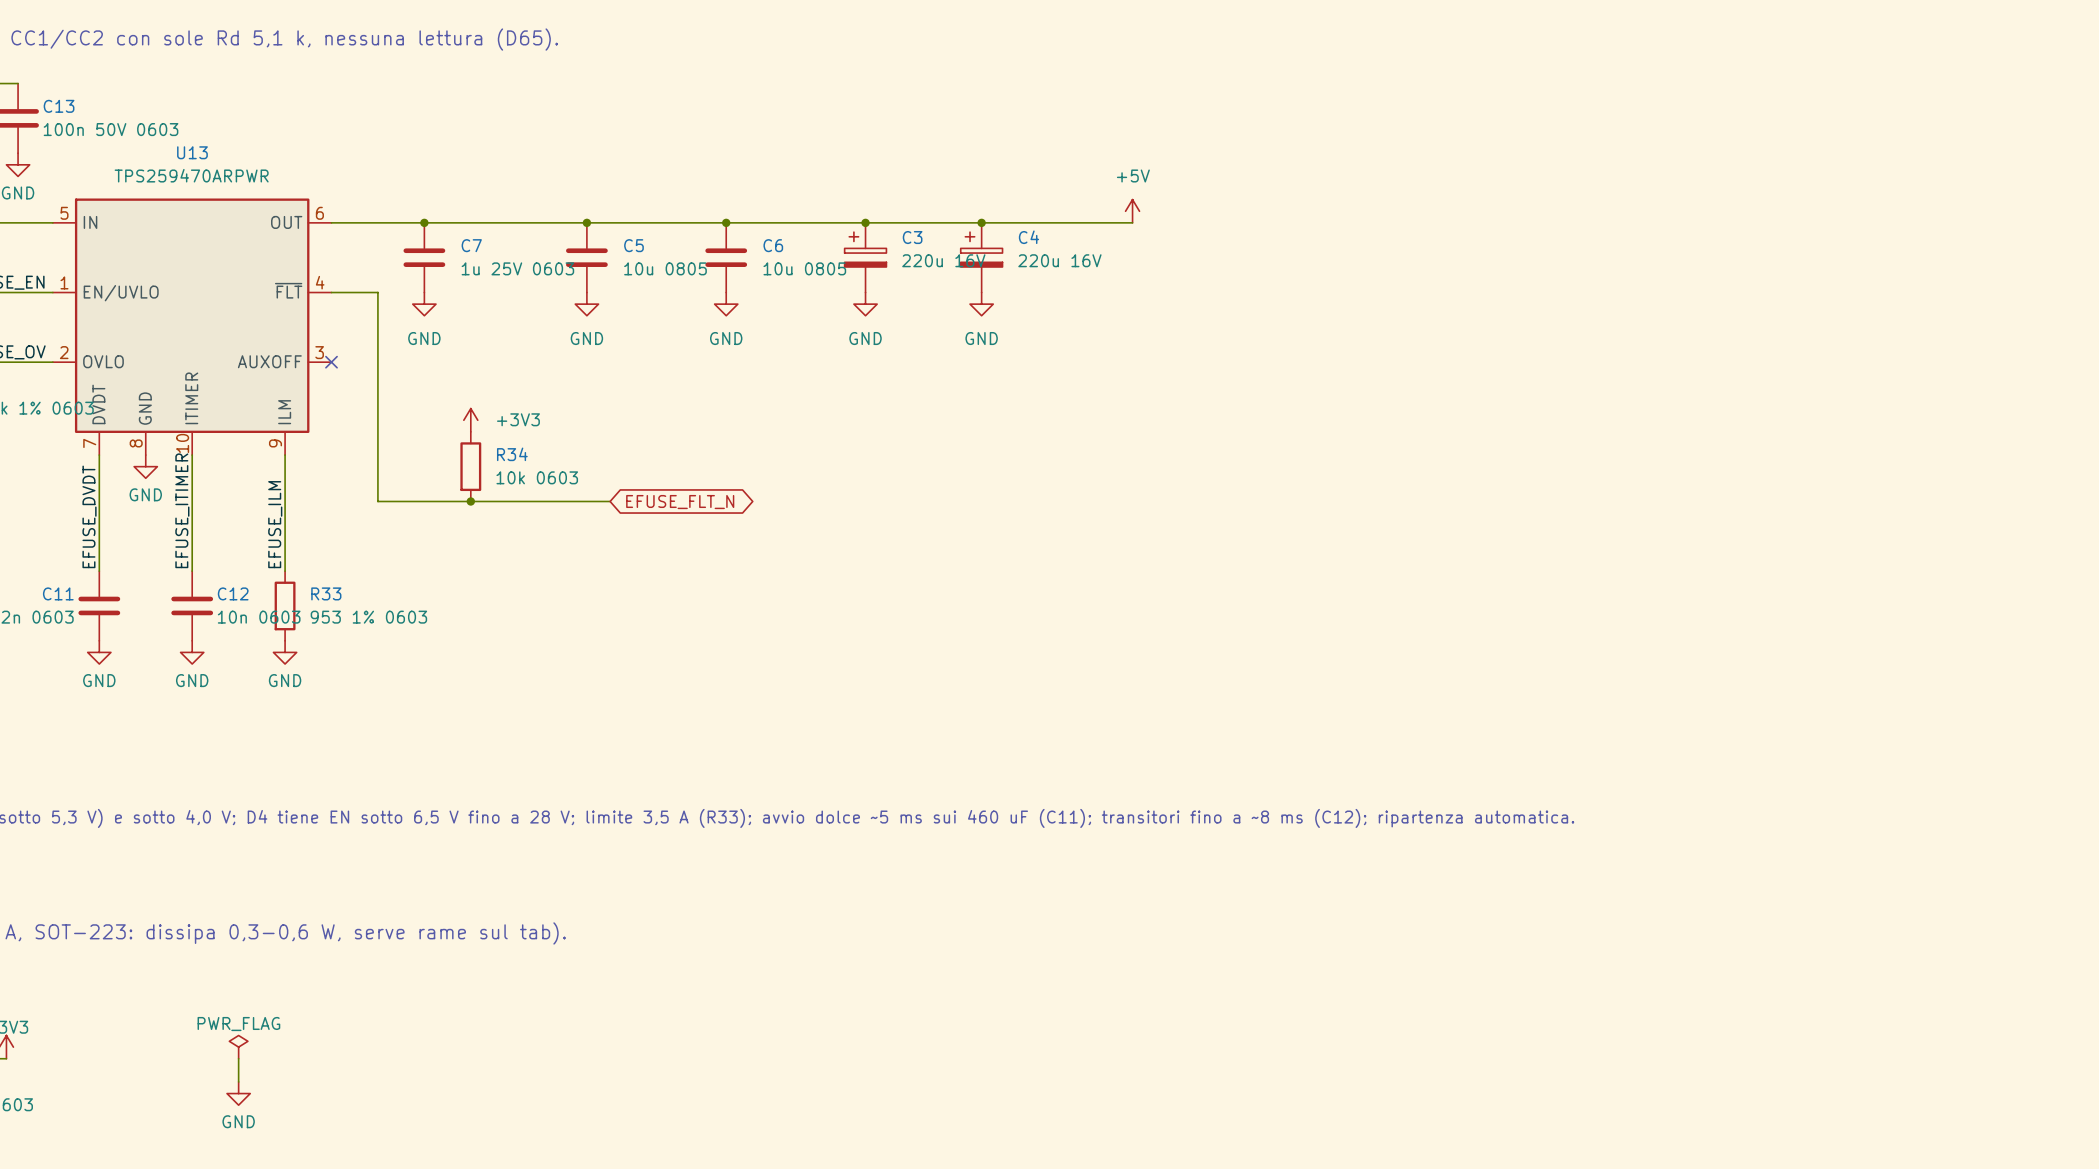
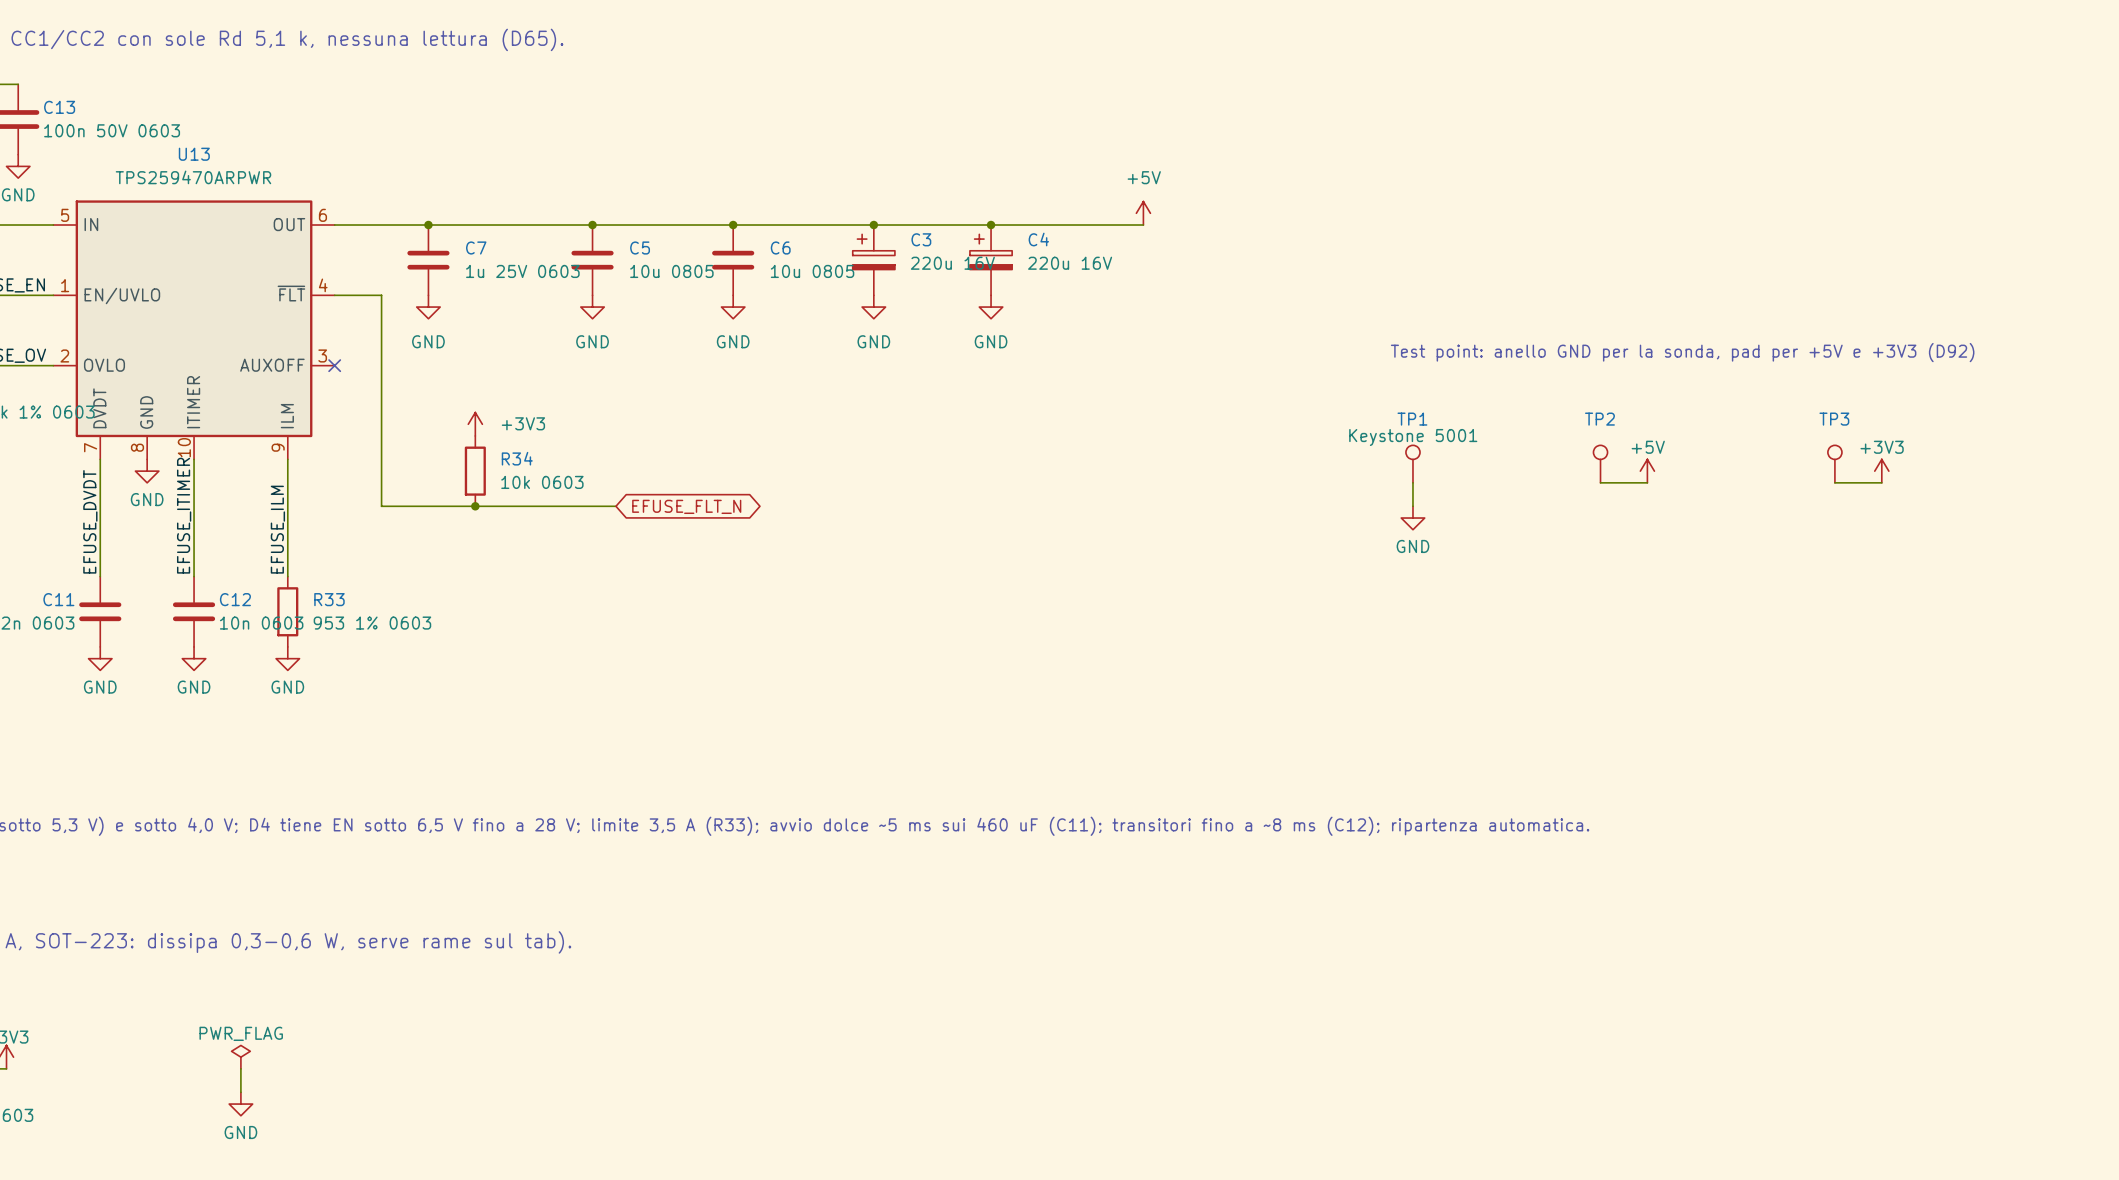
text: none -> Test point: anello GND per la sonda, pad per +5V e +3V3 (D92) (1682, 352)
TP1: none -> Keystone 5001 (1412, 464)
TP2: none -> (1600, 464)
TP3: none -> (1834, 464)
power symbol: none -> +5V (1647, 471)
power symbol: none -> +3V3 (1881, 471)
wire: none -> (1412, 482) (1412, 506)
wire: none -> (1600, 482) (1647, 482)
wire: none -> (1834, 482) (1881, 482)
power symbol: none -> GND (1412, 518)

